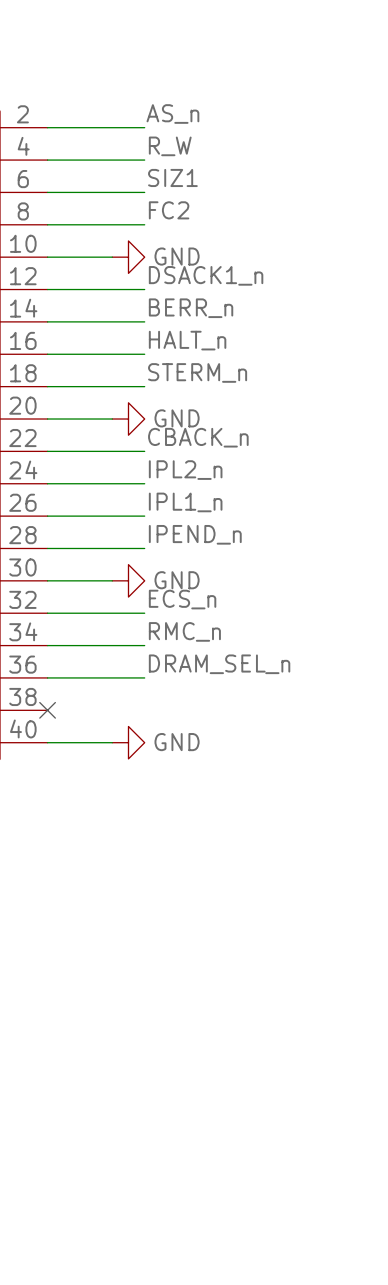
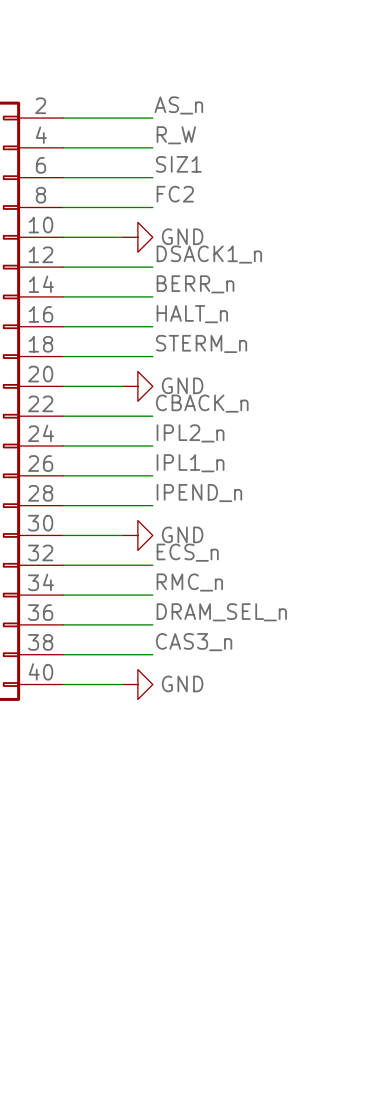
label: none -> CAS3_n (194, 642)
wire: none -> (63, 654) (152, 654)
no-connect mark: (47, 710) -> none

